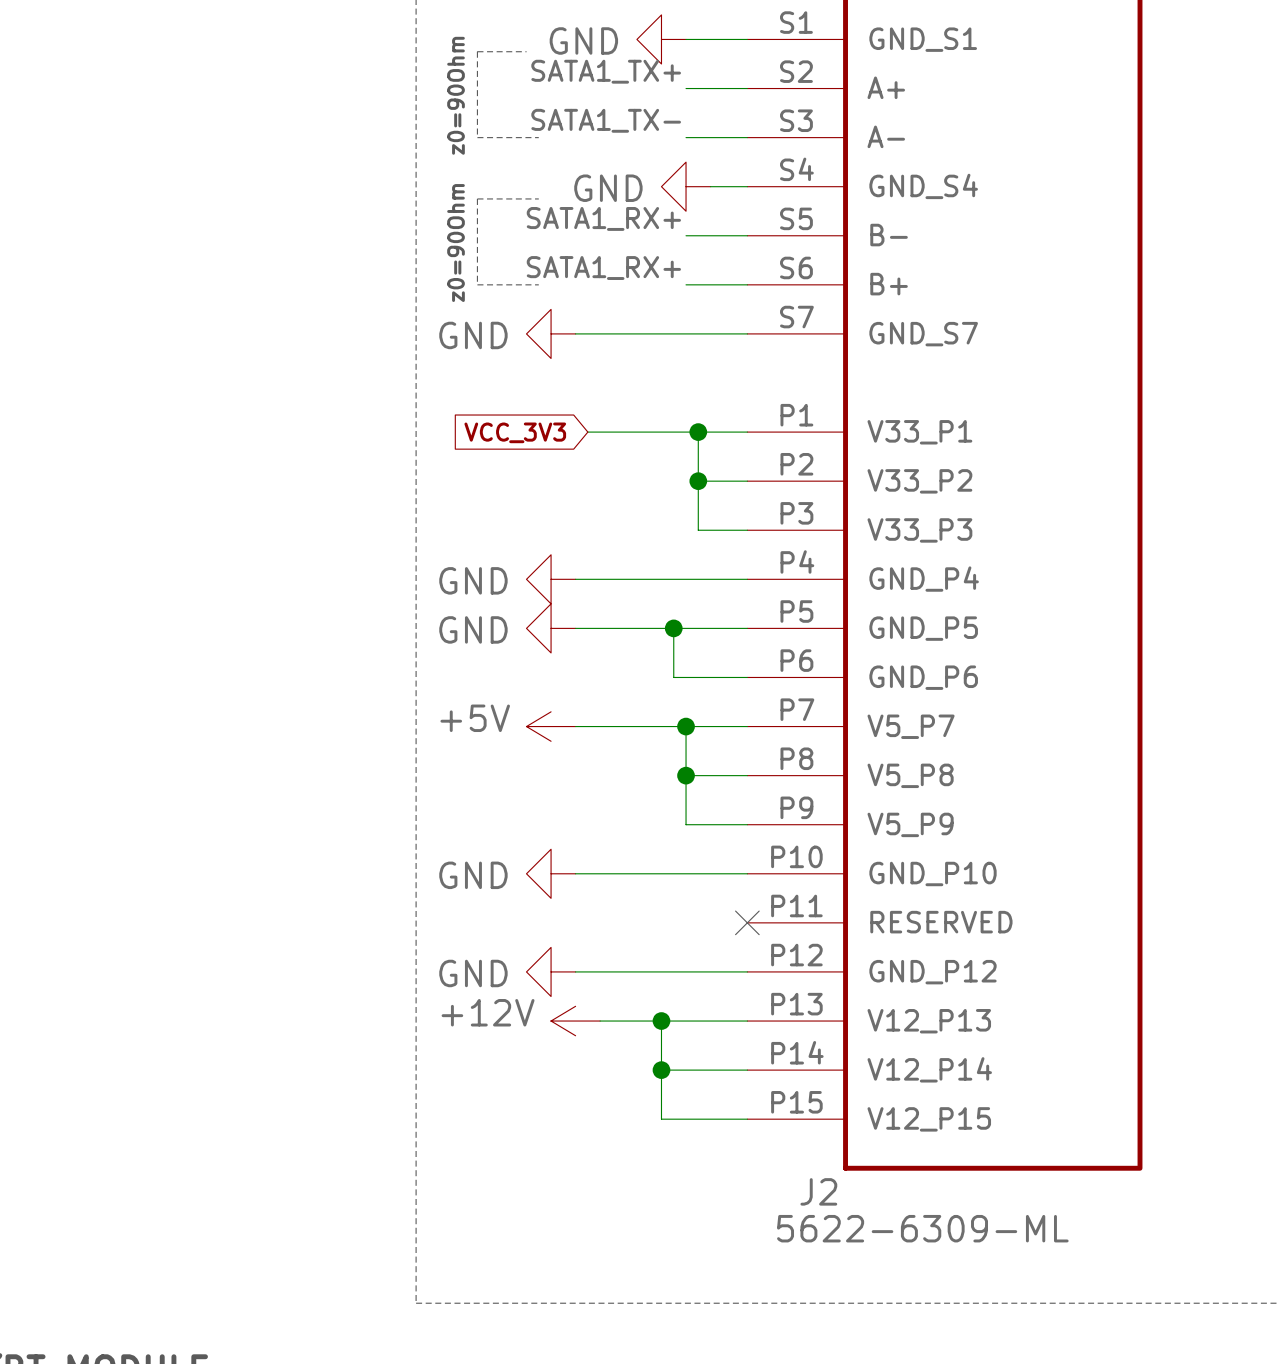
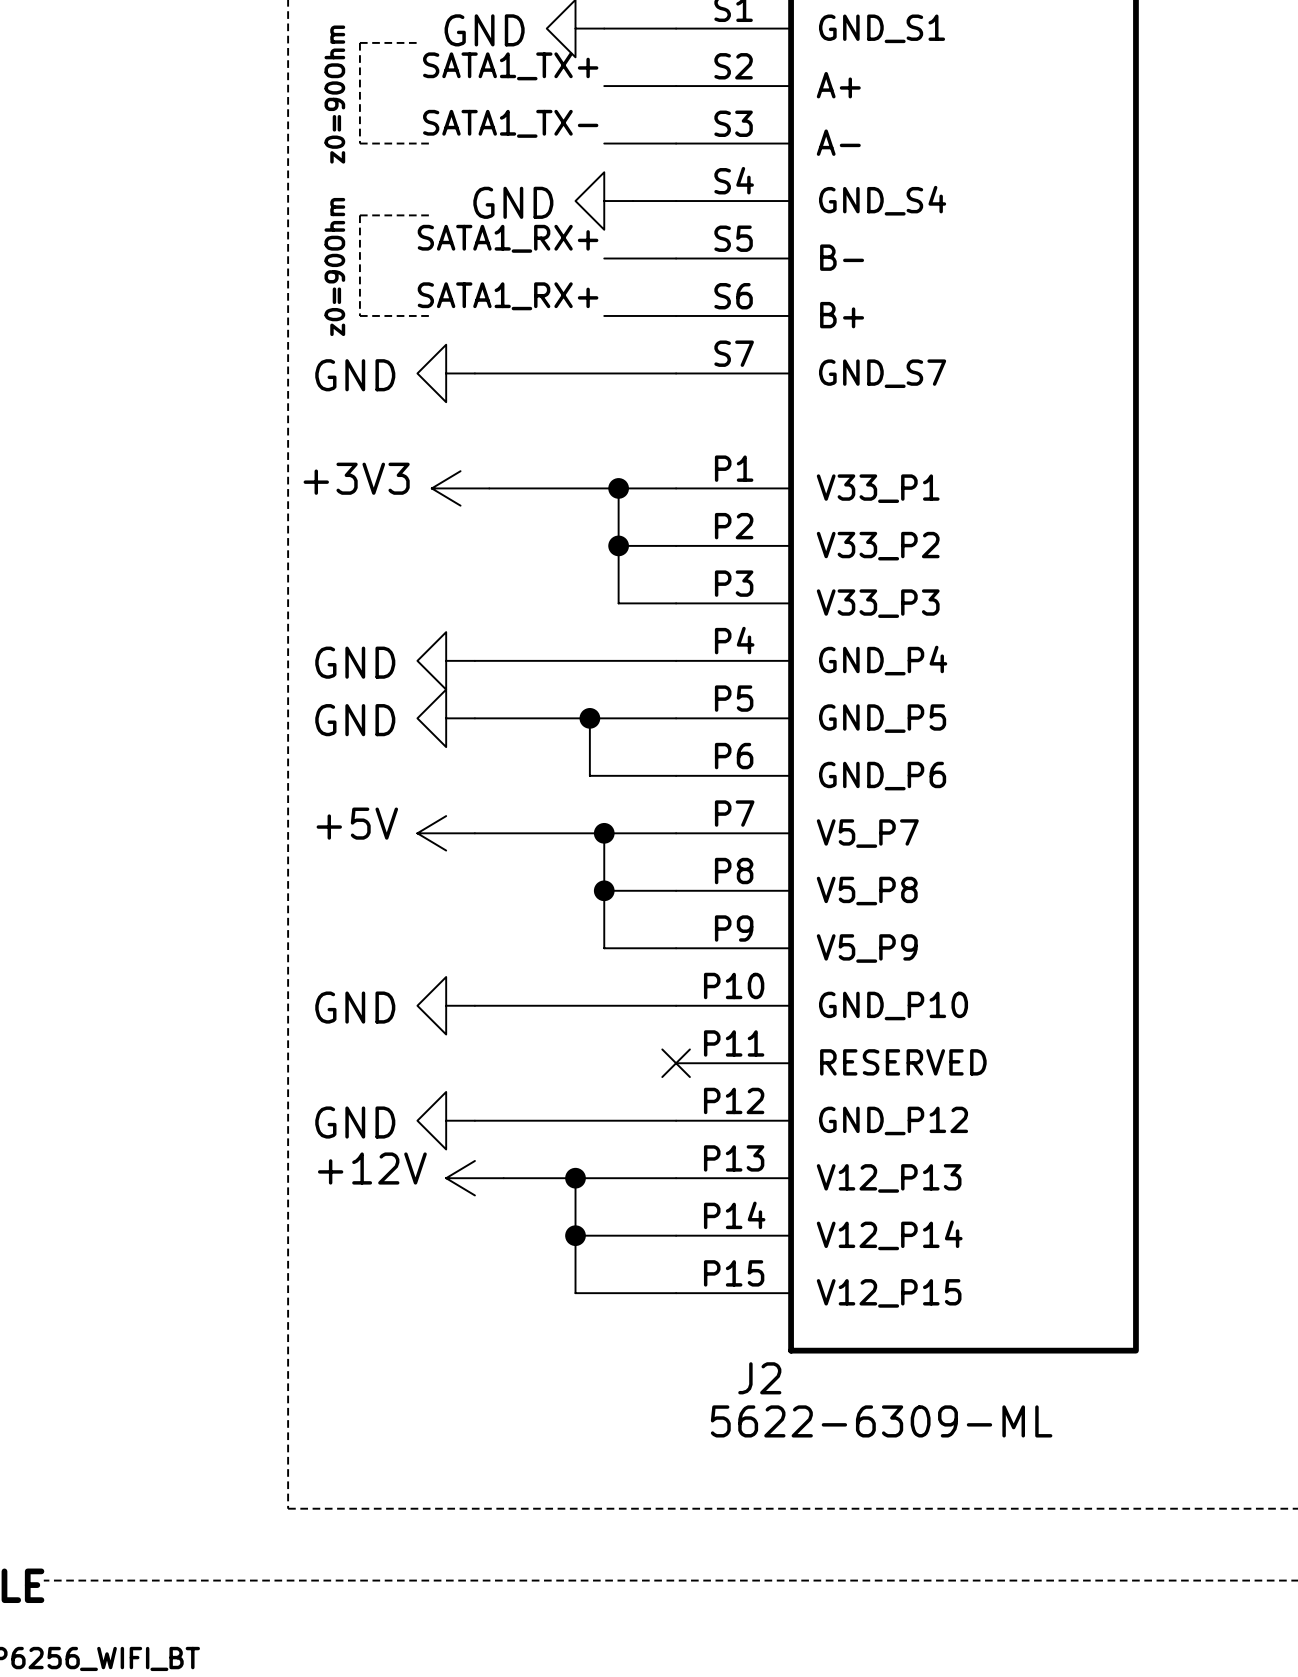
global label: VCC_3V3 (515, 432) -> none
power symbol: none -> +3V3 (460, 488)

